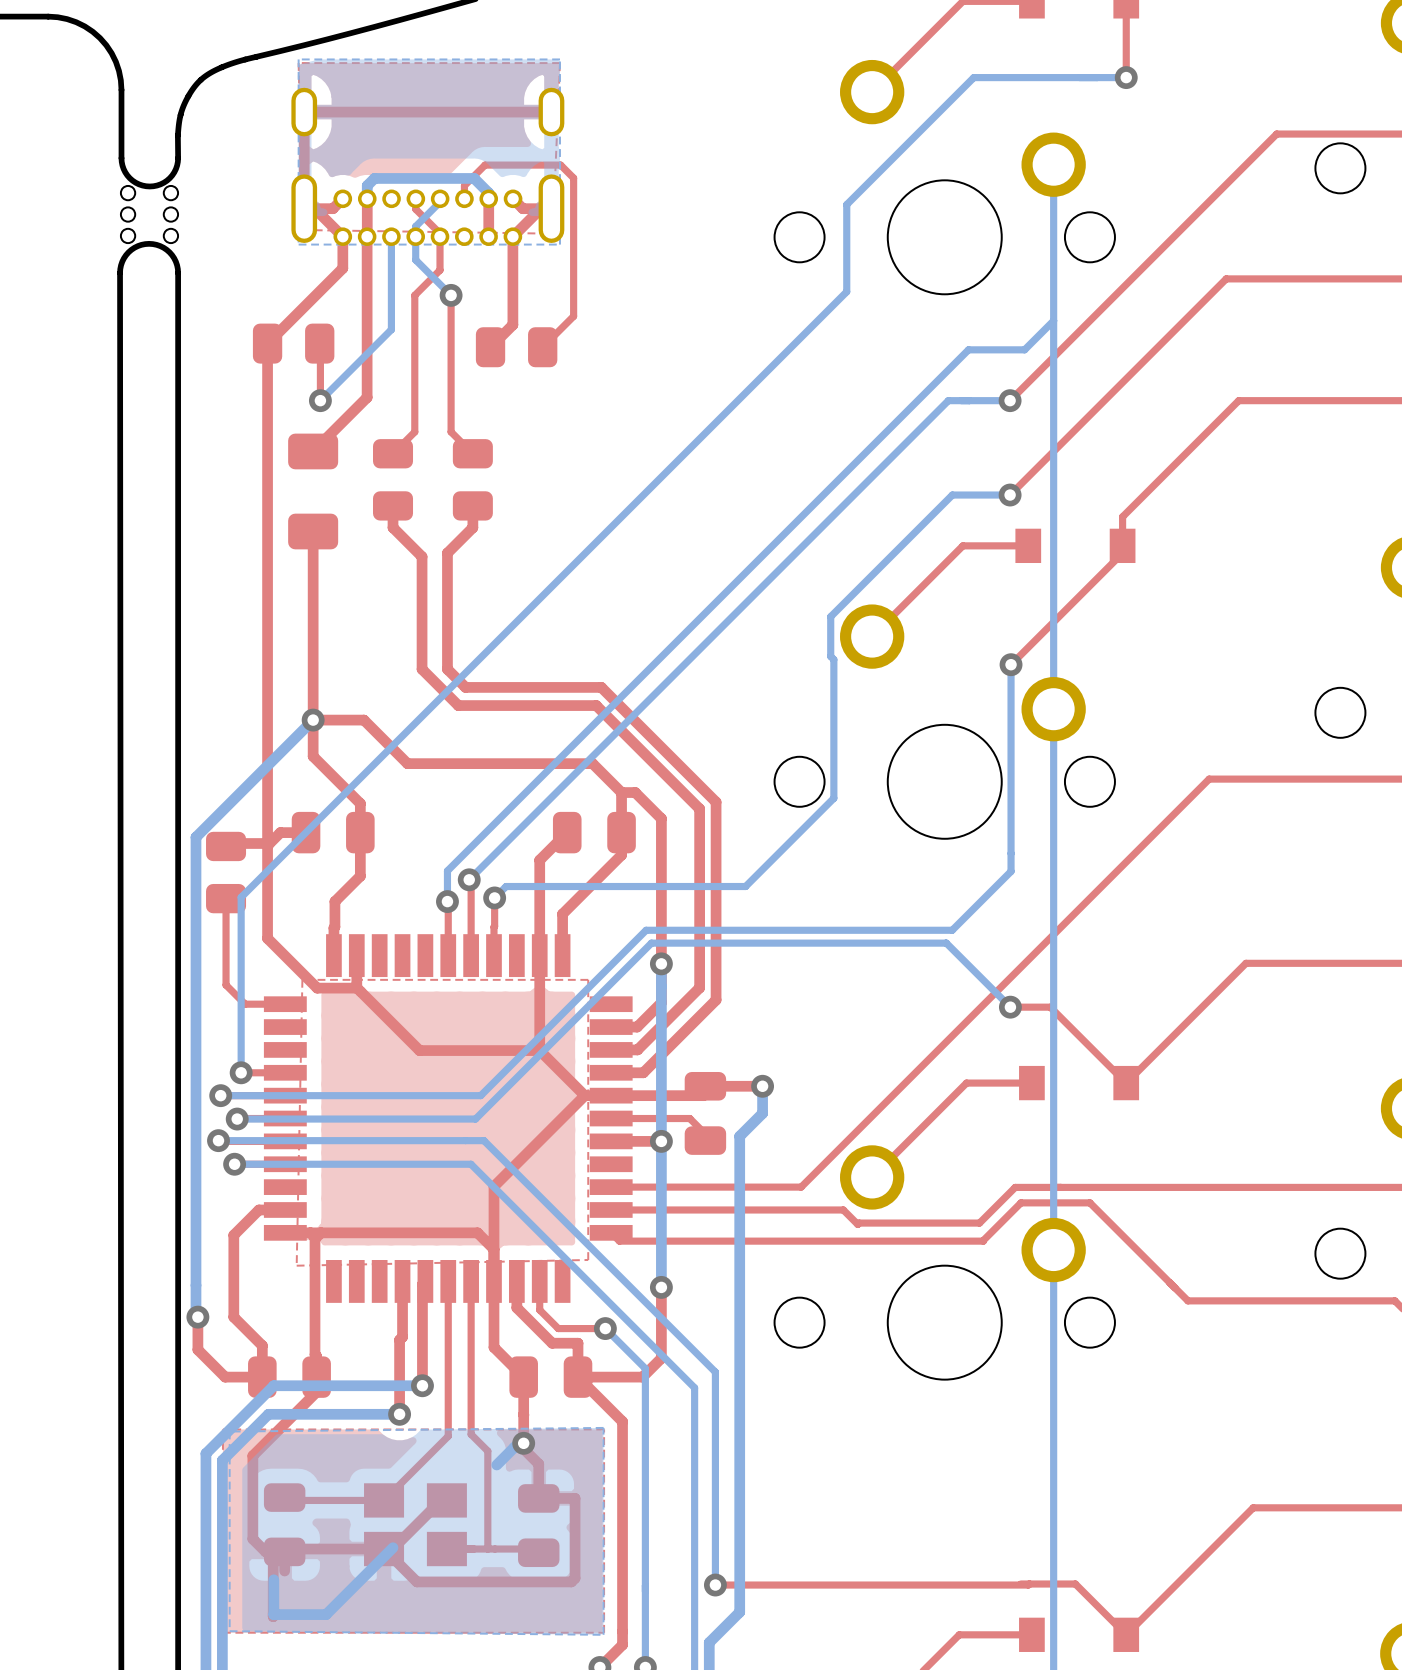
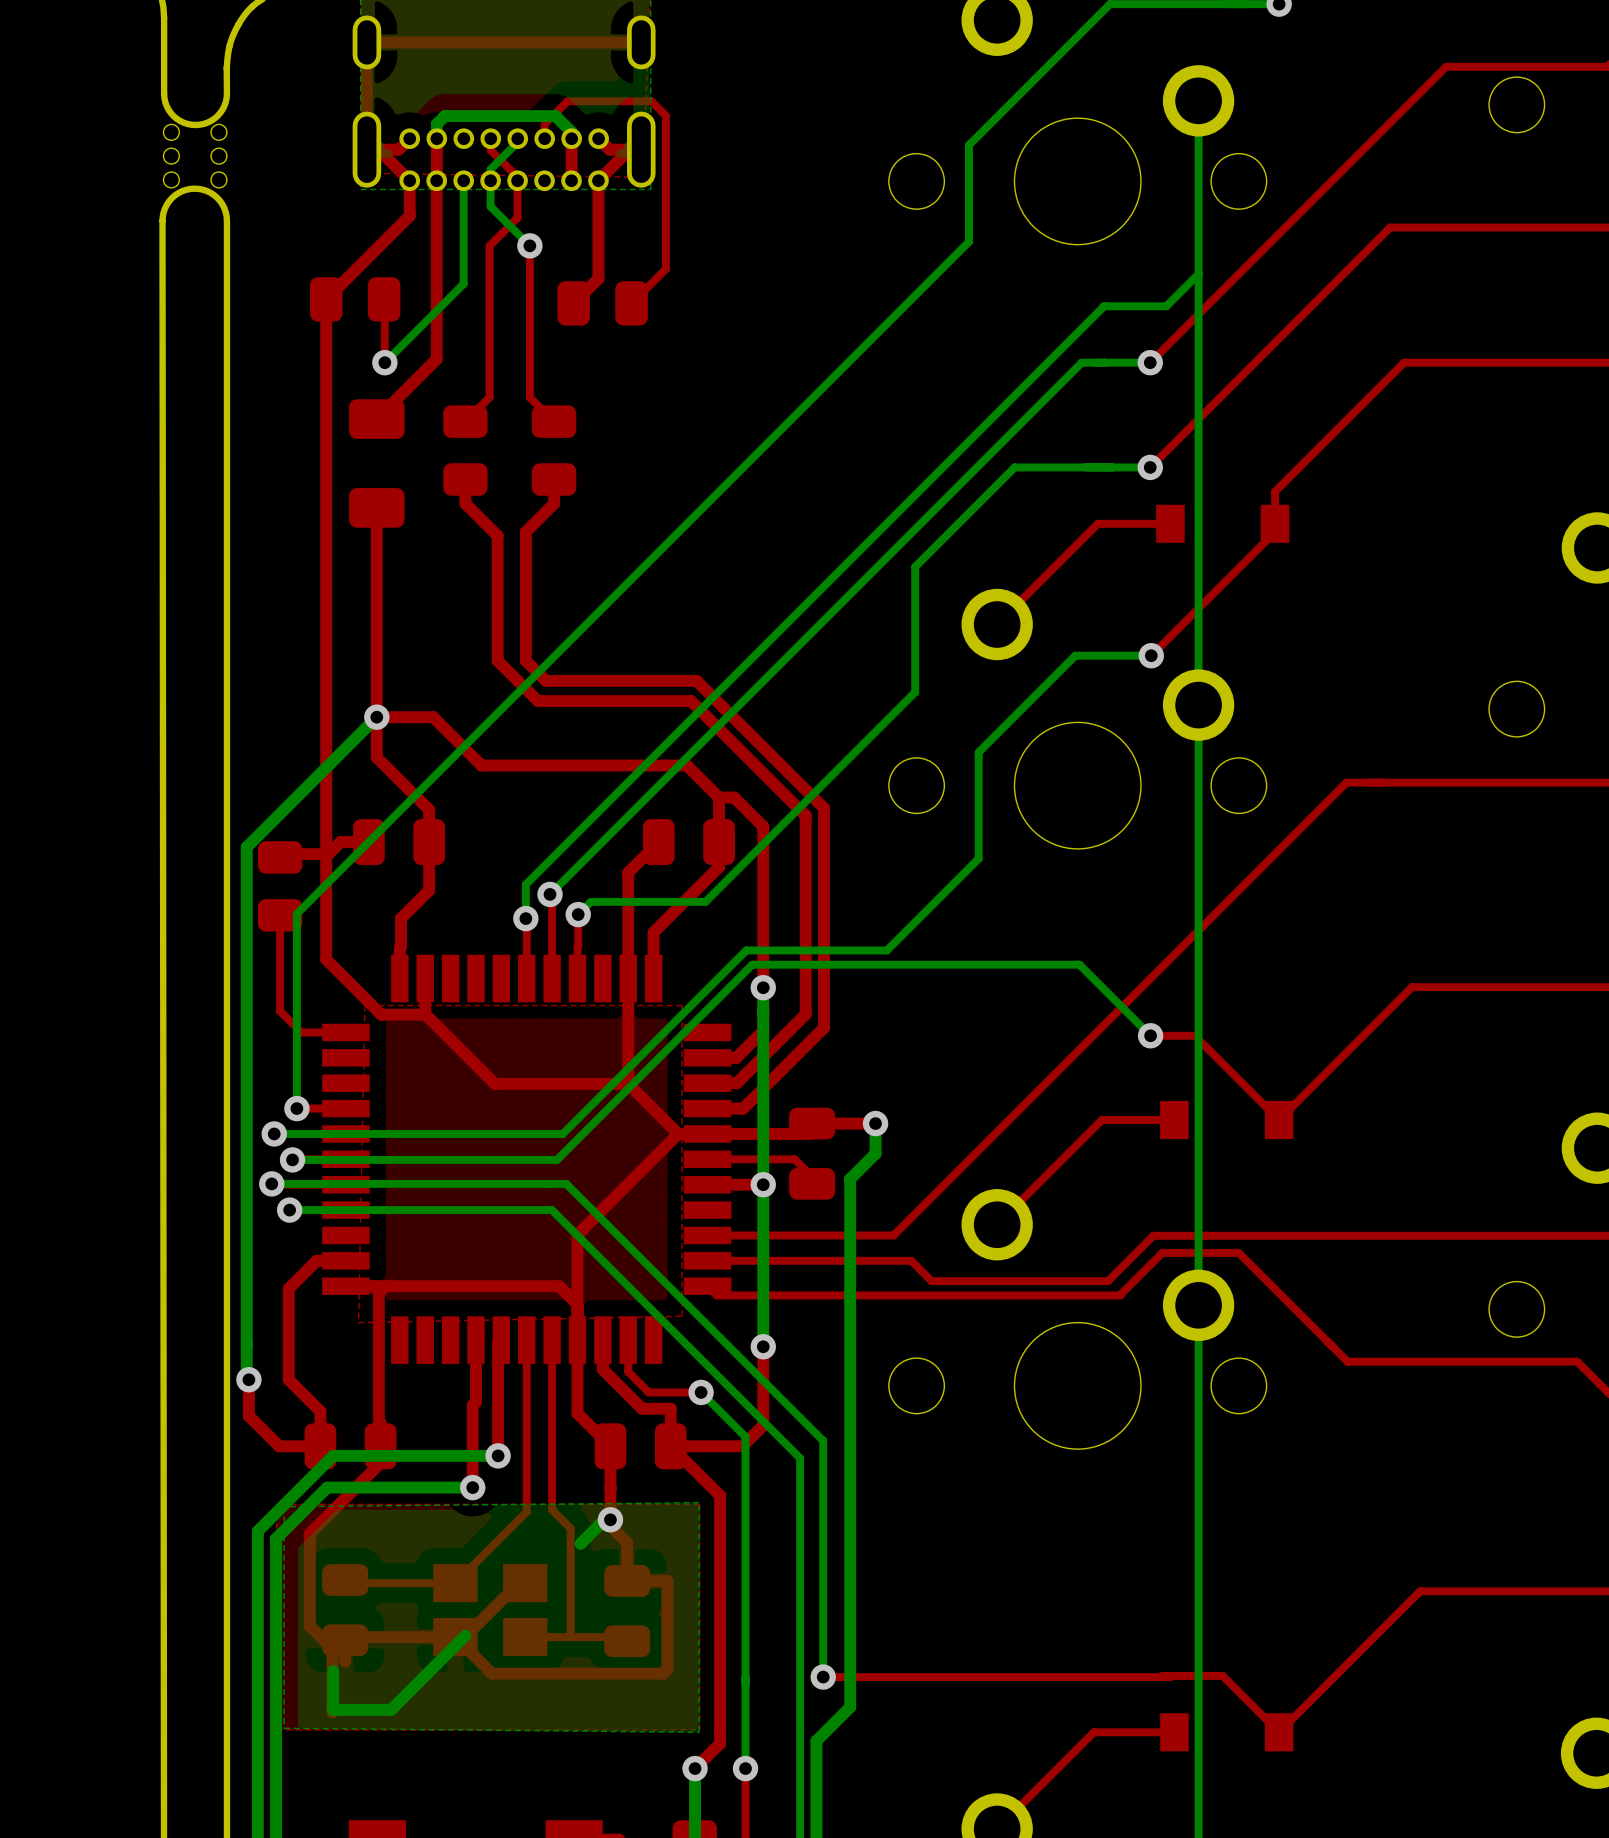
bottom track: (952, 495) (830, 616) (830, 656) (833, 659) (833, 798) (745, 886) (609, 886) -> (1086, 467) (1014, 467) (915, 566) (915, 692) (705, 901)
bottom track: (1011, 664) (1011, 871) (952, 930) (772, 930) -> (1151, 655) (1075, 655) (978, 752) (978, 858) (886, 950)
top track: (1209, 779) (801, 1187) (778, 1187) -> (1371, 782) (1346, 782) (893, 1235)
top track: (1015, 1187) (979, 1223) (857, 1224) (843, 1209) (794, 1209) -> (1155, 1235) (1153, 1235) (1108, 1281) (931, 1281) (911, 1260)

